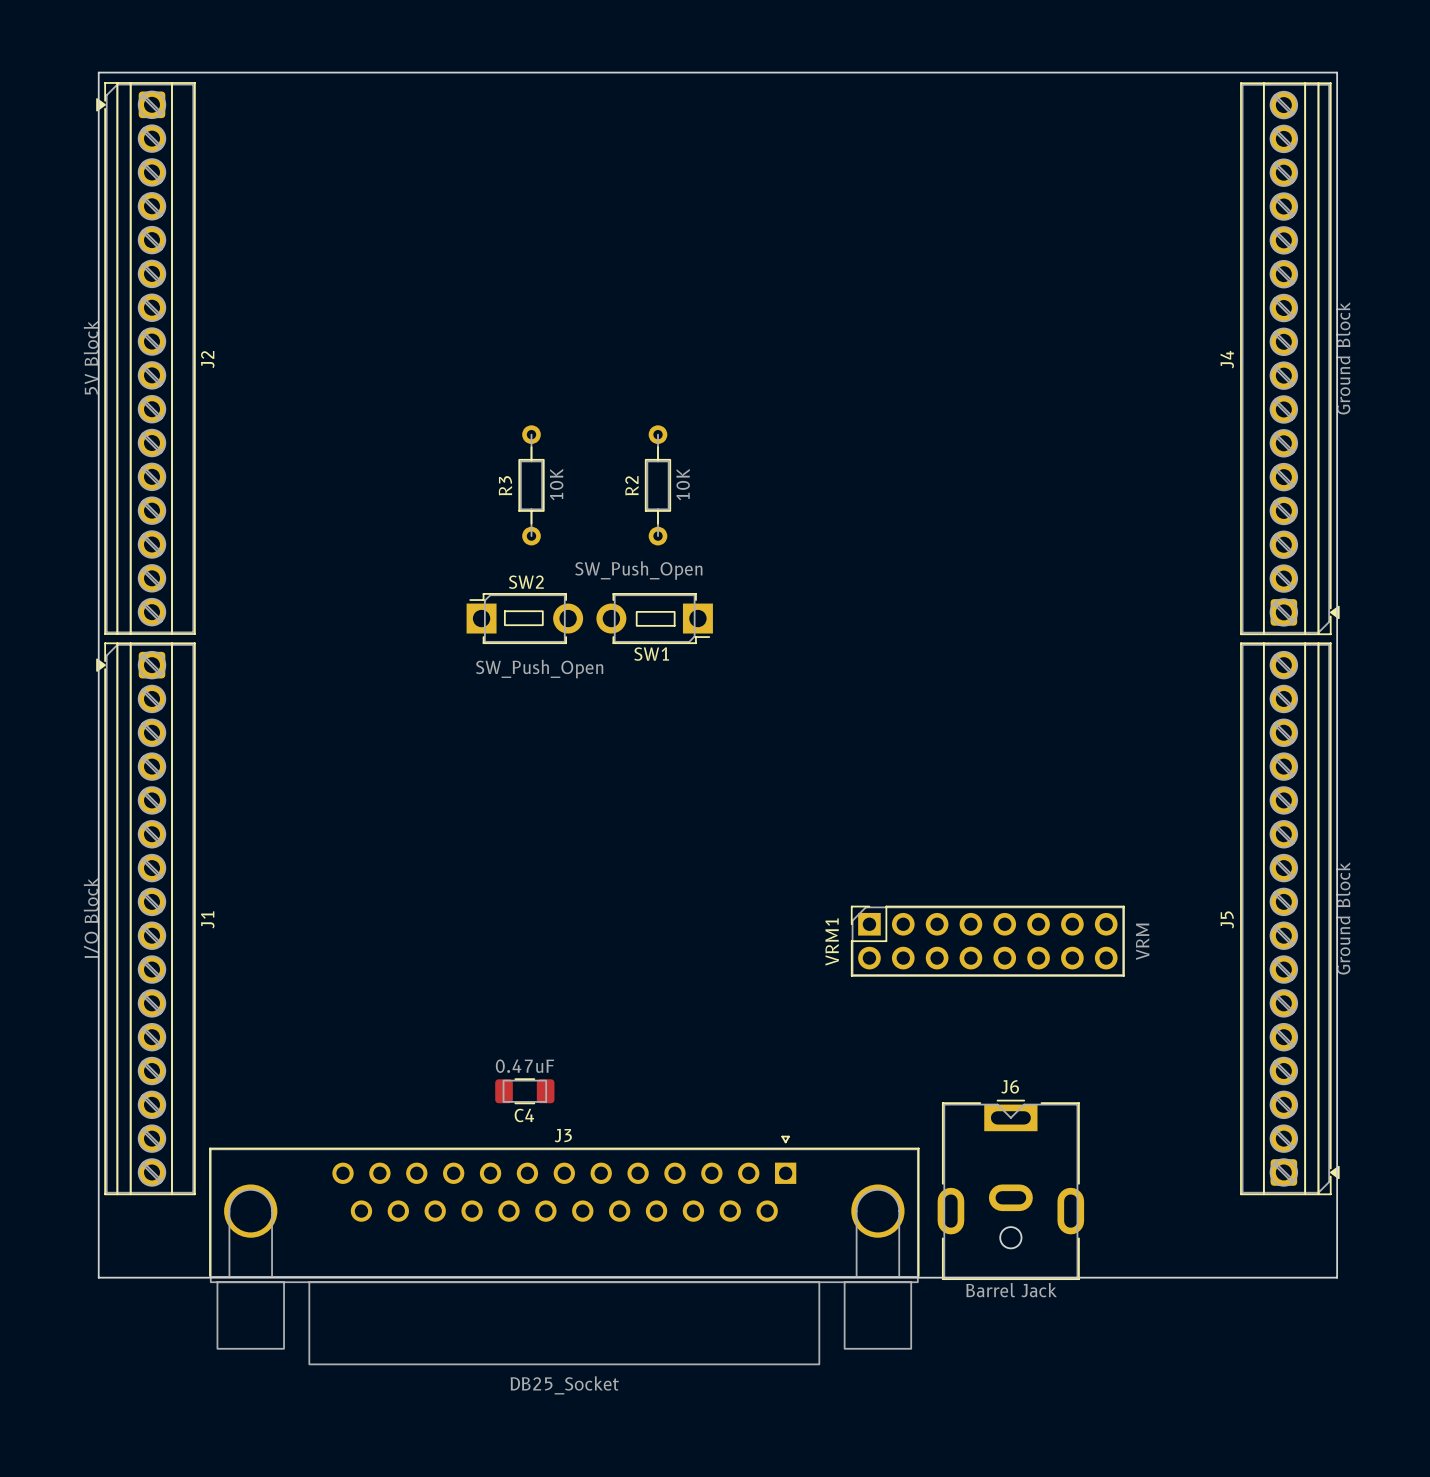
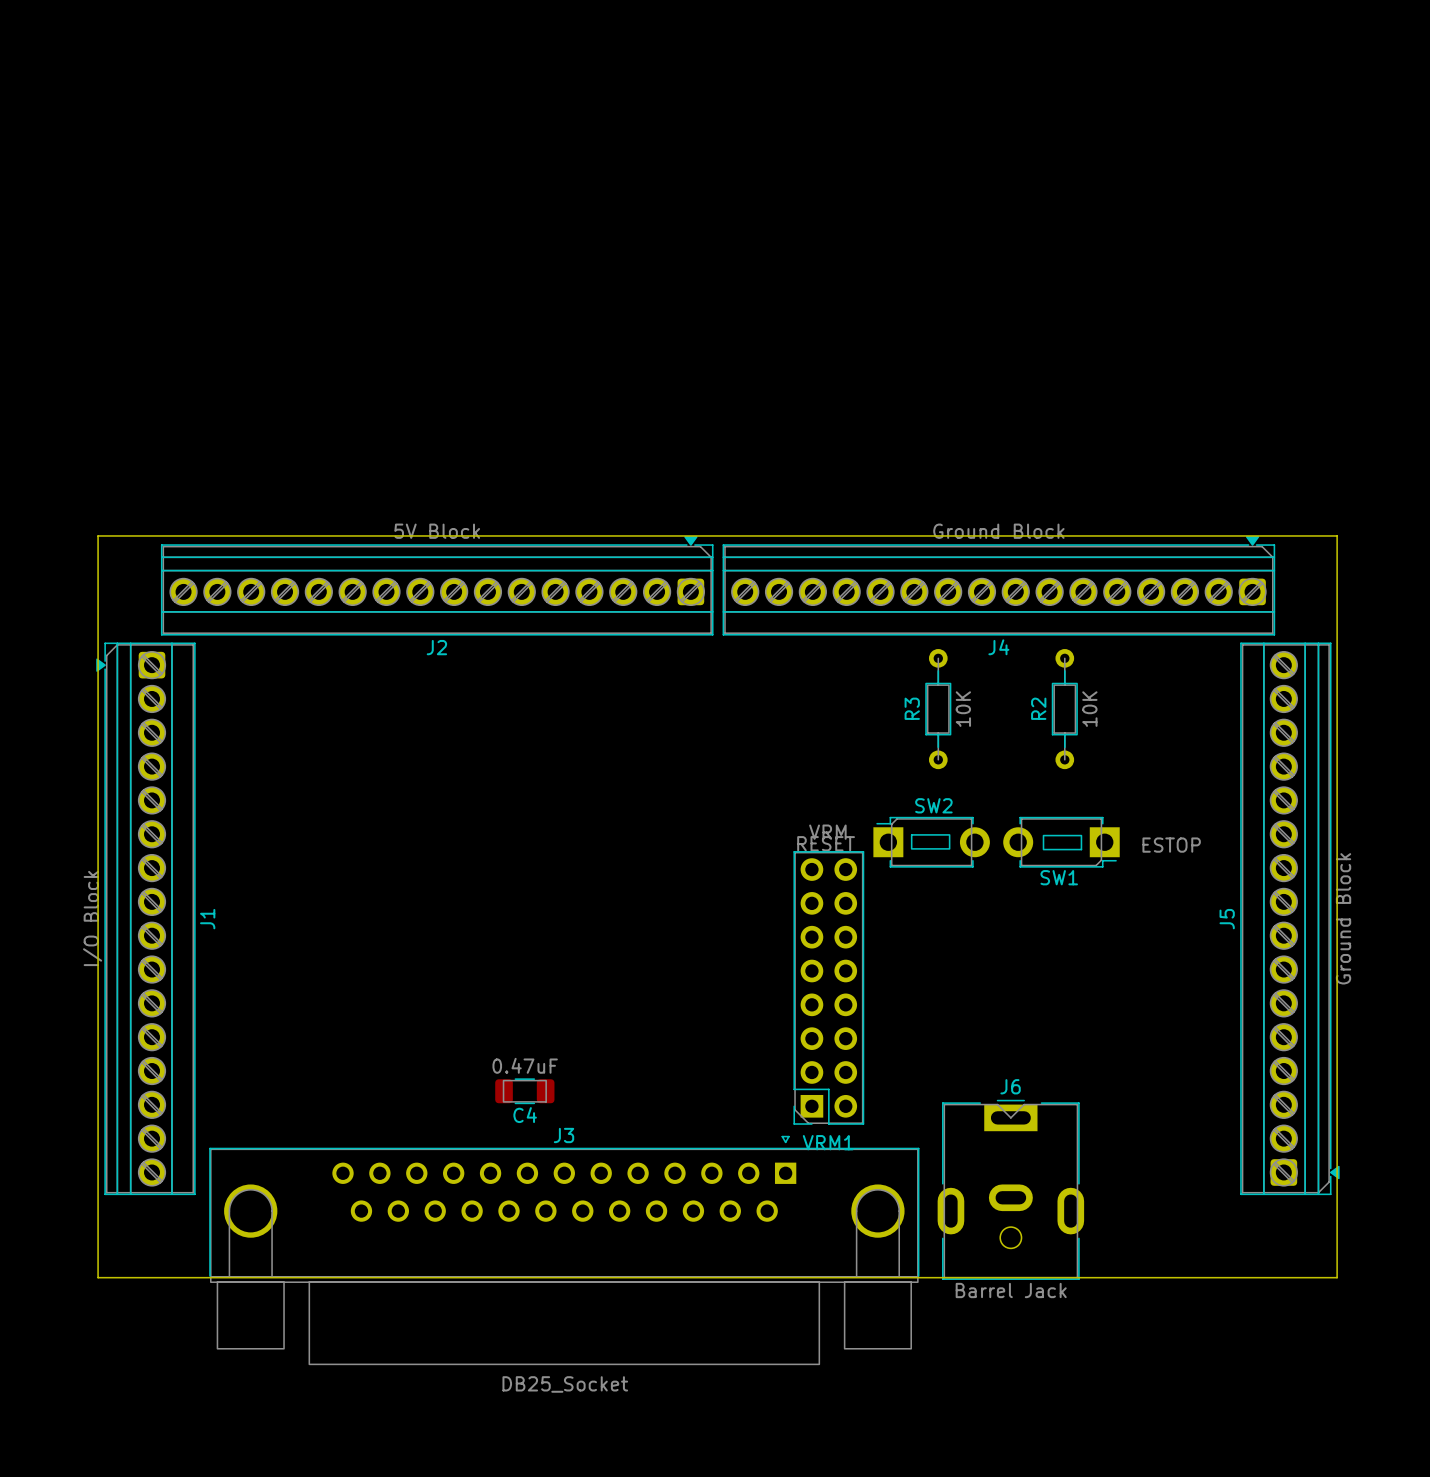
J2 rotation: 0° (145, 358) -> 90° clockwise (437, 585)
J2 position: (145, 358) -> (437, 585)
J4 rotation: 0° (1289, 358) -> 90° counterclockwise (998, 585)
J4 position: (1289, 358) -> (998, 585)
R3 position: (531, 485) -> (938, 709)
R2 position: (658, 485) -> (1064, 709)
board edge: (1337, 535) (1337, 72) (98, 72) (98, 1277) -> (1337, 535) (98, 535) (98, 1277)
SW1 value: SW_Push_Open (638, 570) -> ESTOP (1171, 845)
SW2 position: (524, 618) -> (931, 842)
SW1 position: (654, 618) -> (1061, 842)
SW2 value: SW_Push_Open (539, 669) -> RESET (826, 843)
VRM1 rotation: 0° (987, 941) -> 90° counterclockwise (828, 987)
VRM1 position: (987, 941) -> (828, 987)

